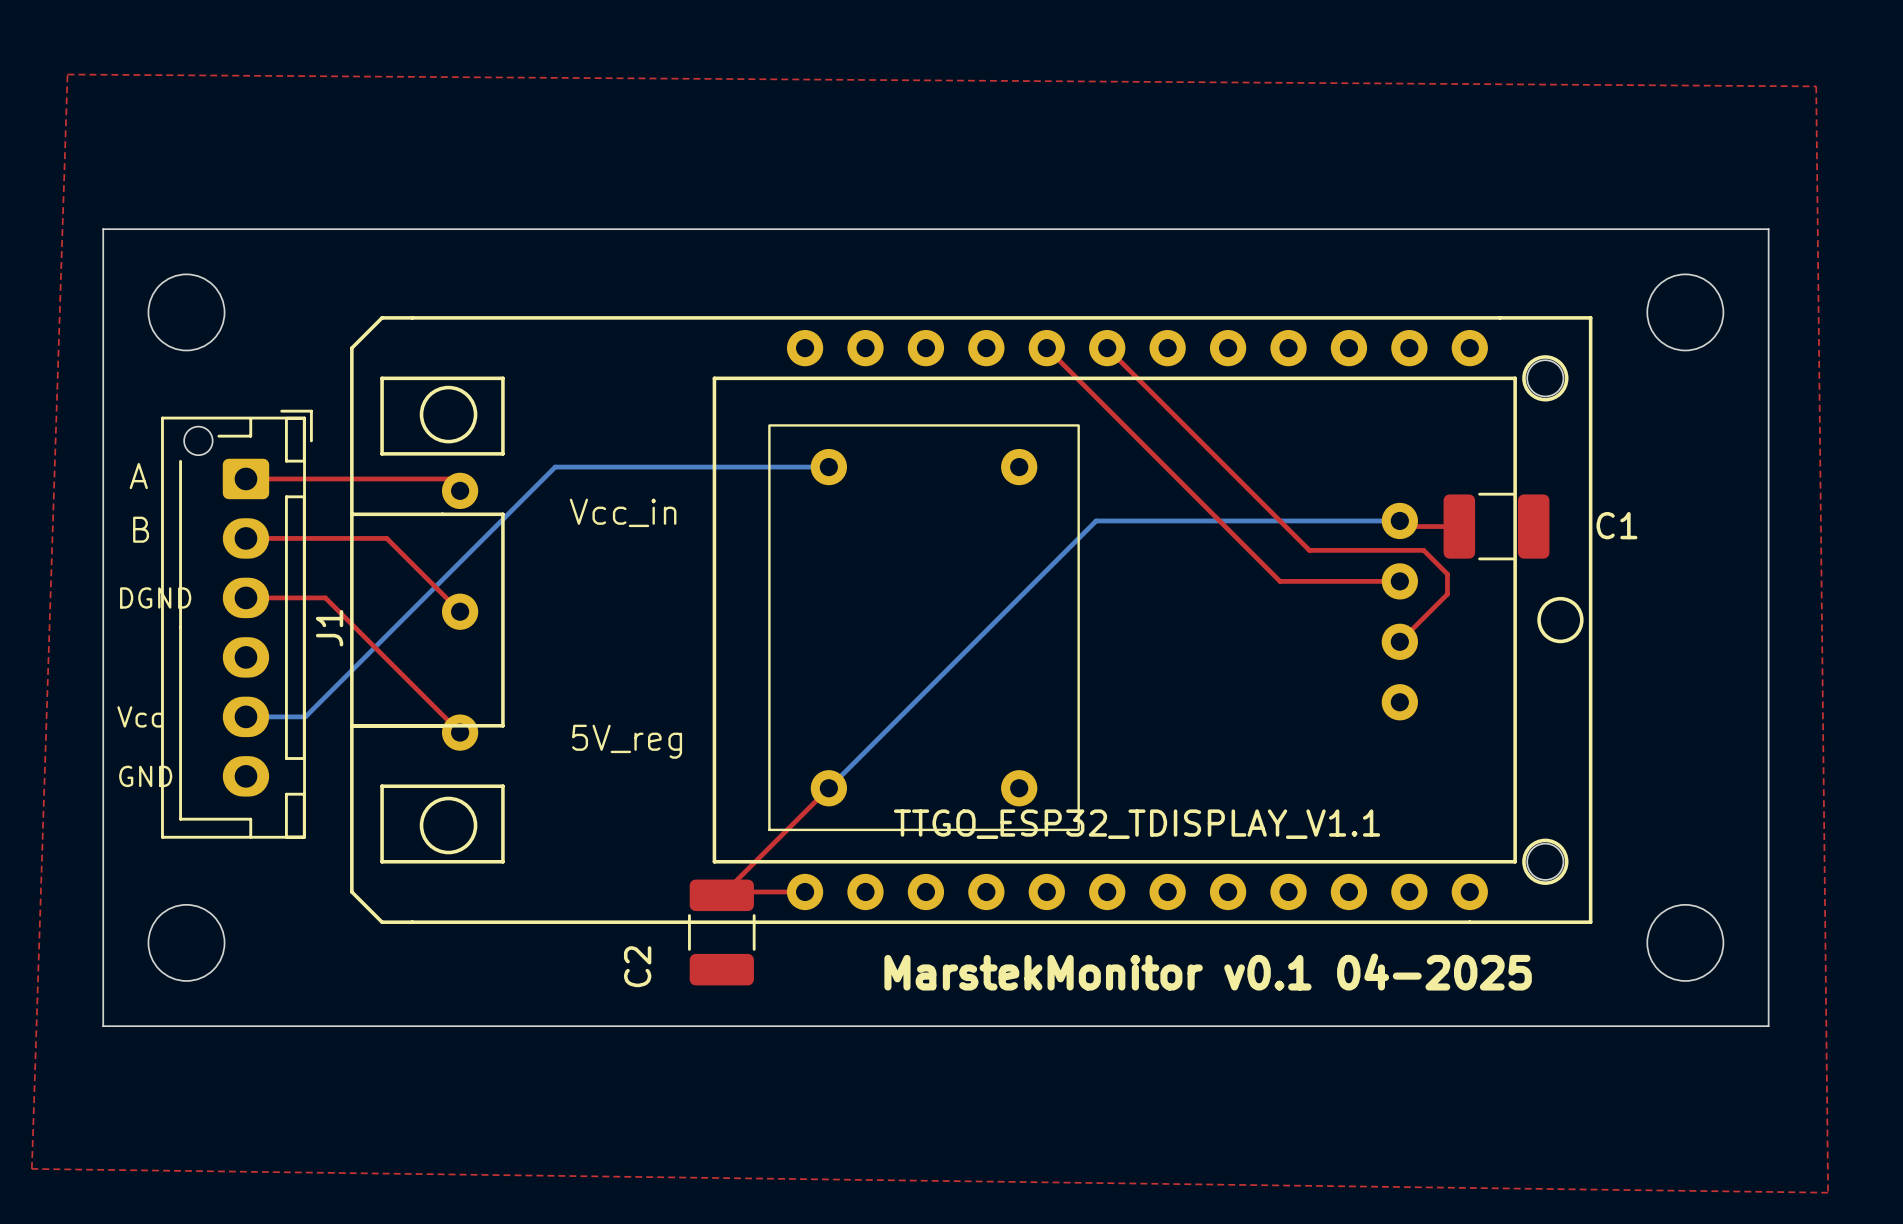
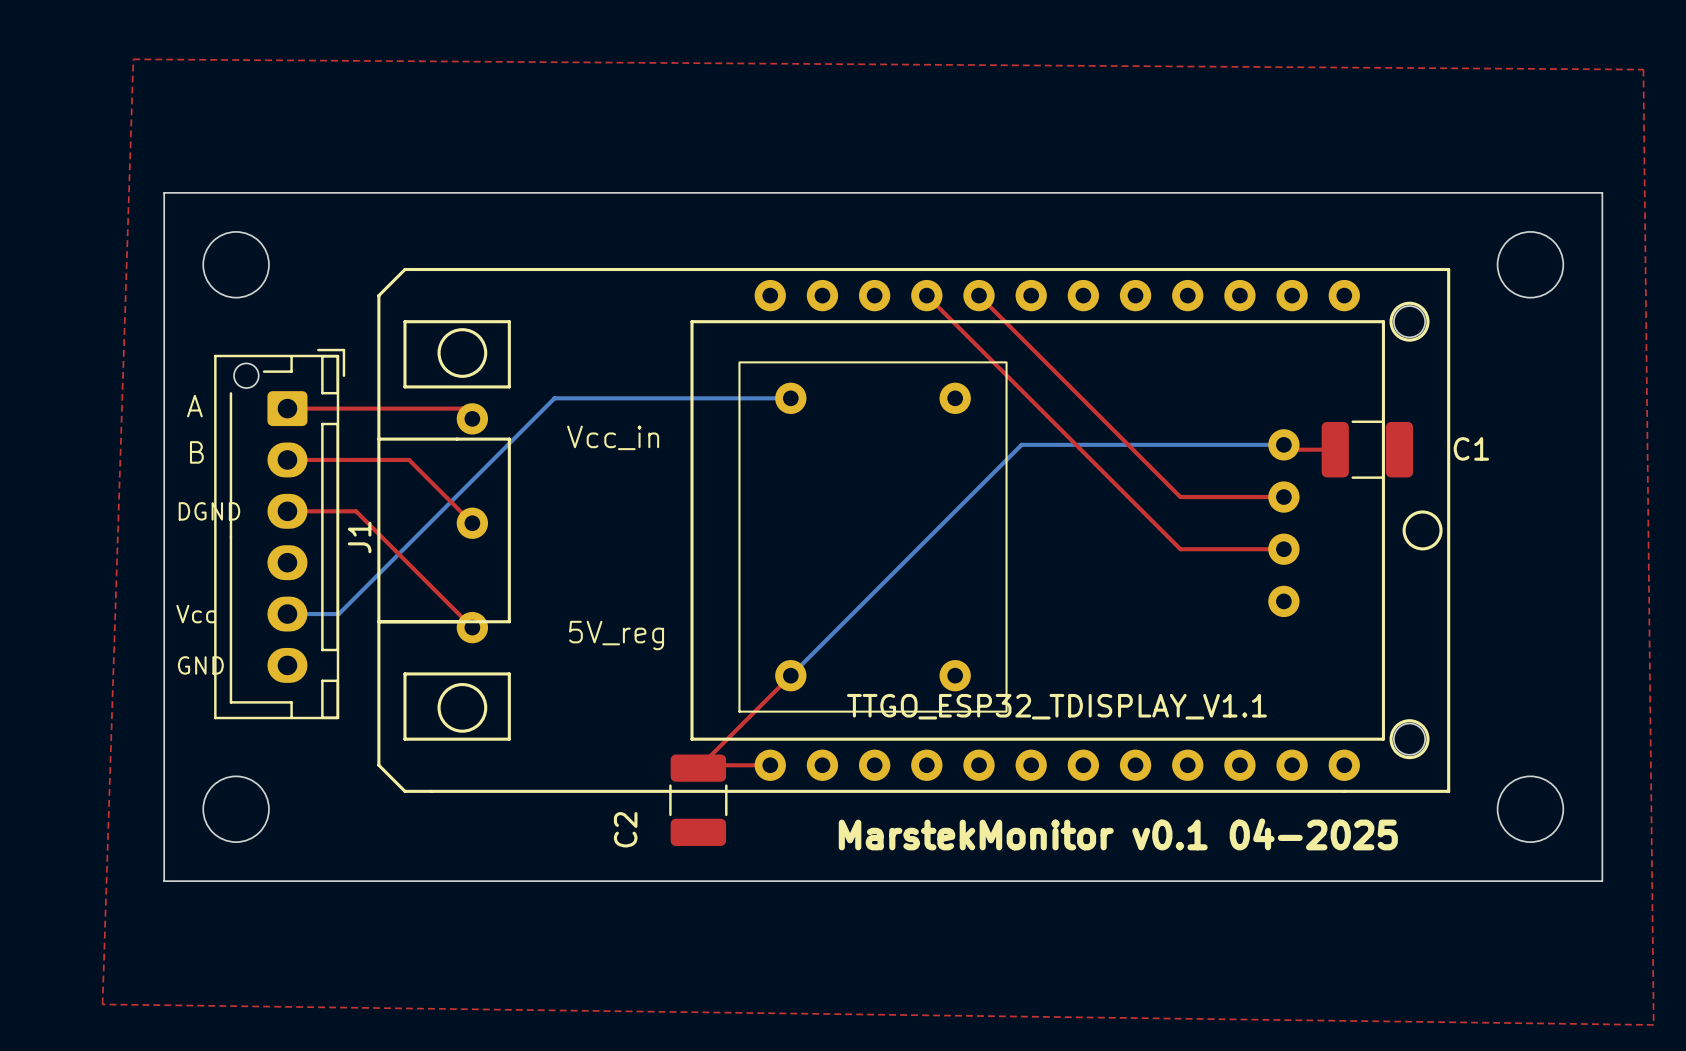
top track: (1107, 348) (1309, 550) (1423, 550) (1447, 574) (1447, 594) (1399, 641) -> (926, 295) (1180, 549) (1283, 549)

